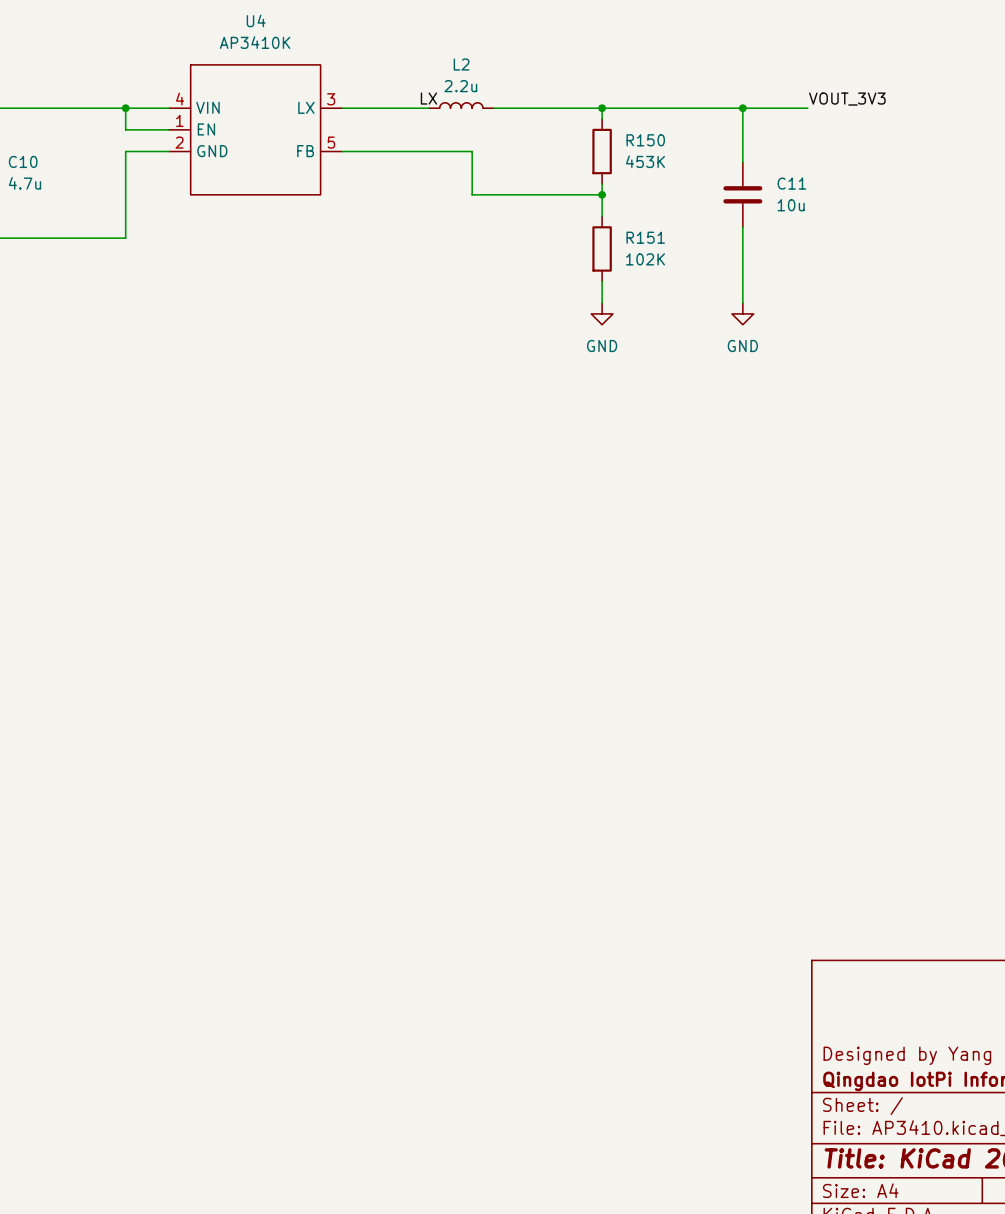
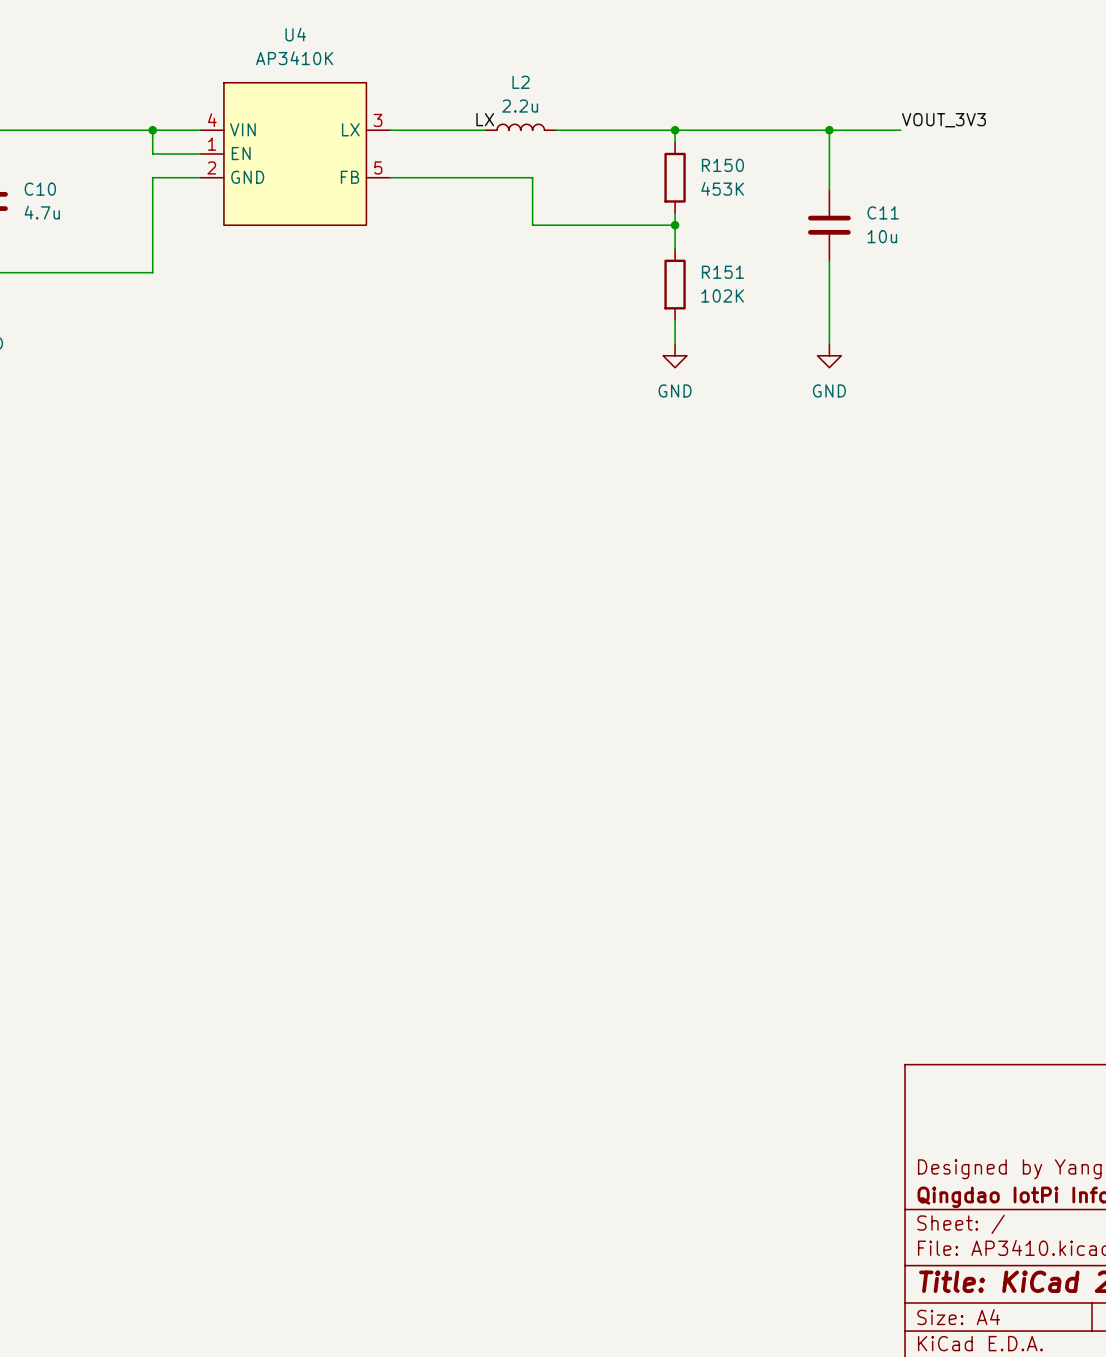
U4 symbol: [169, 64, 343, 195] -> [200, 82, 391, 226]

